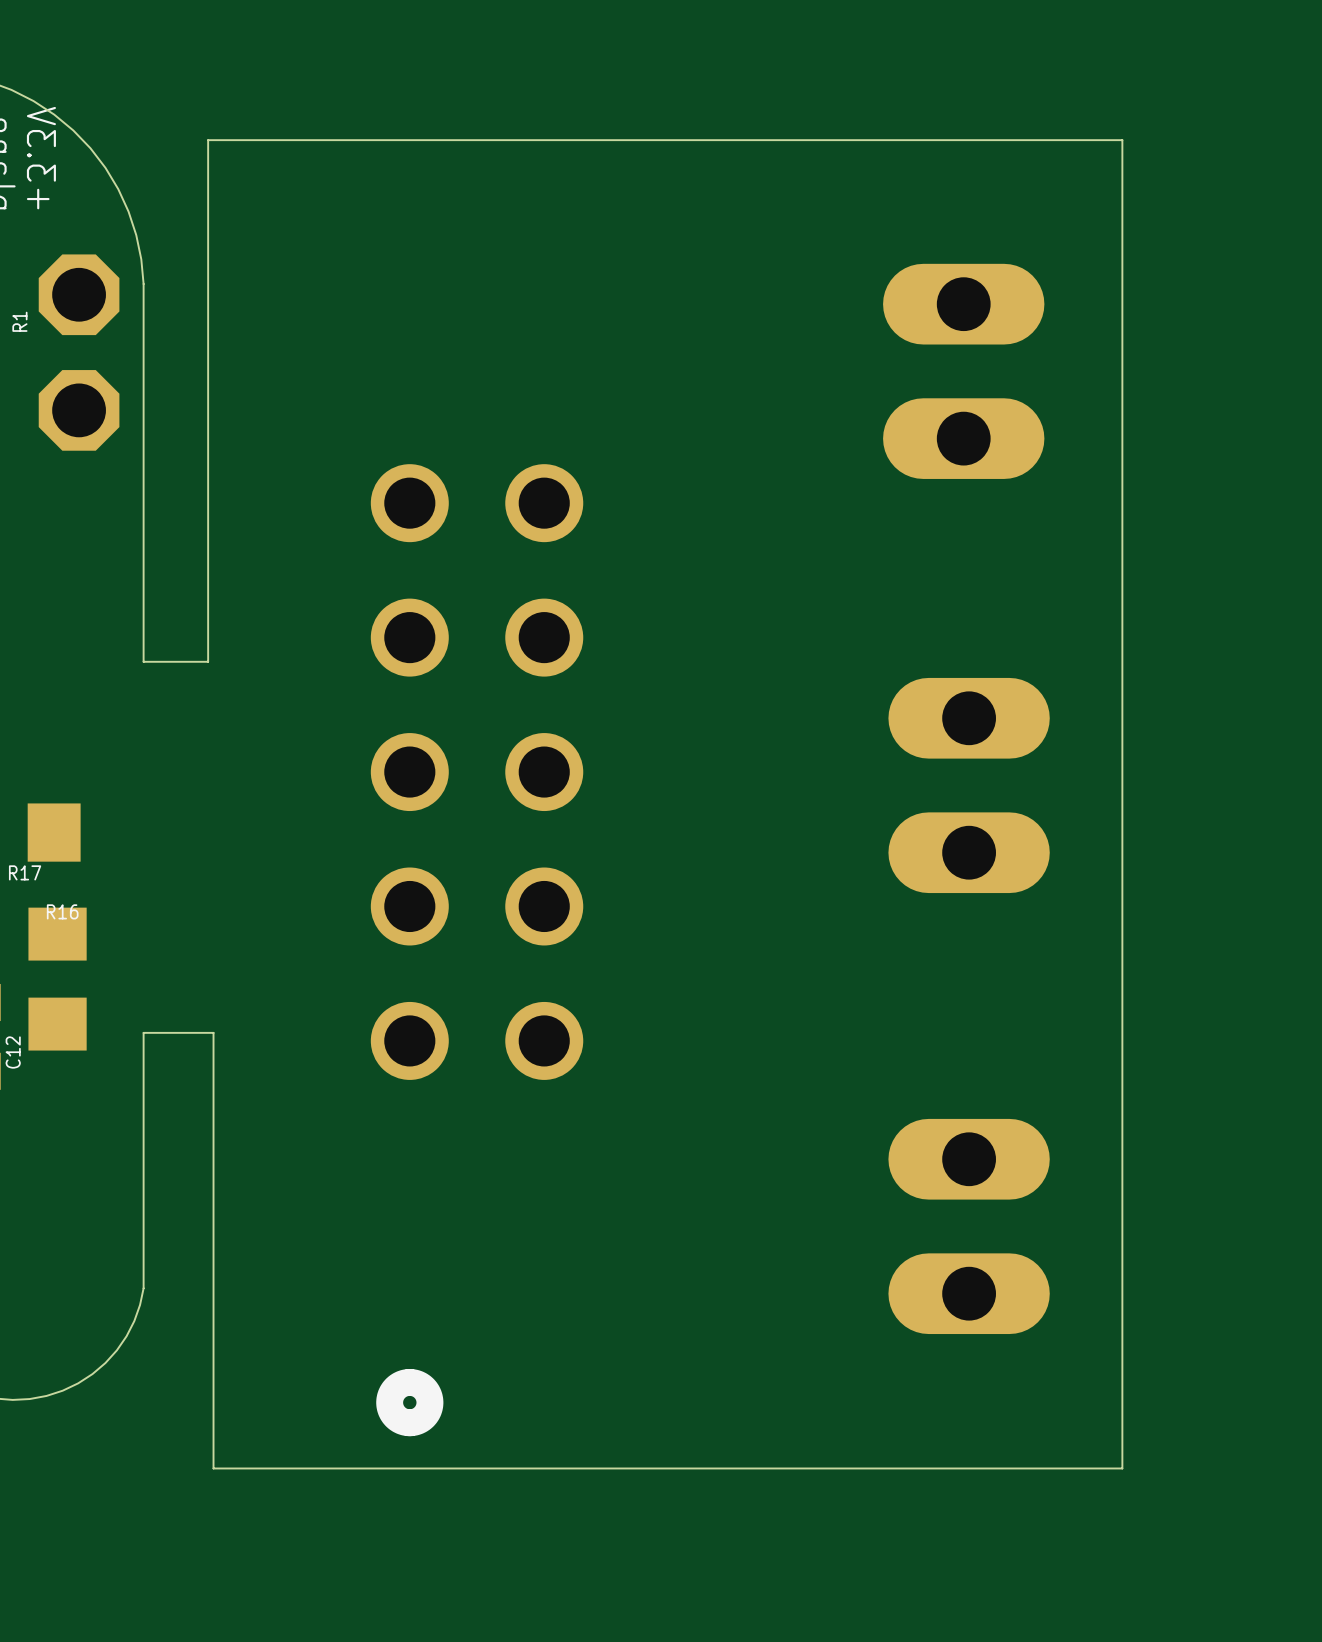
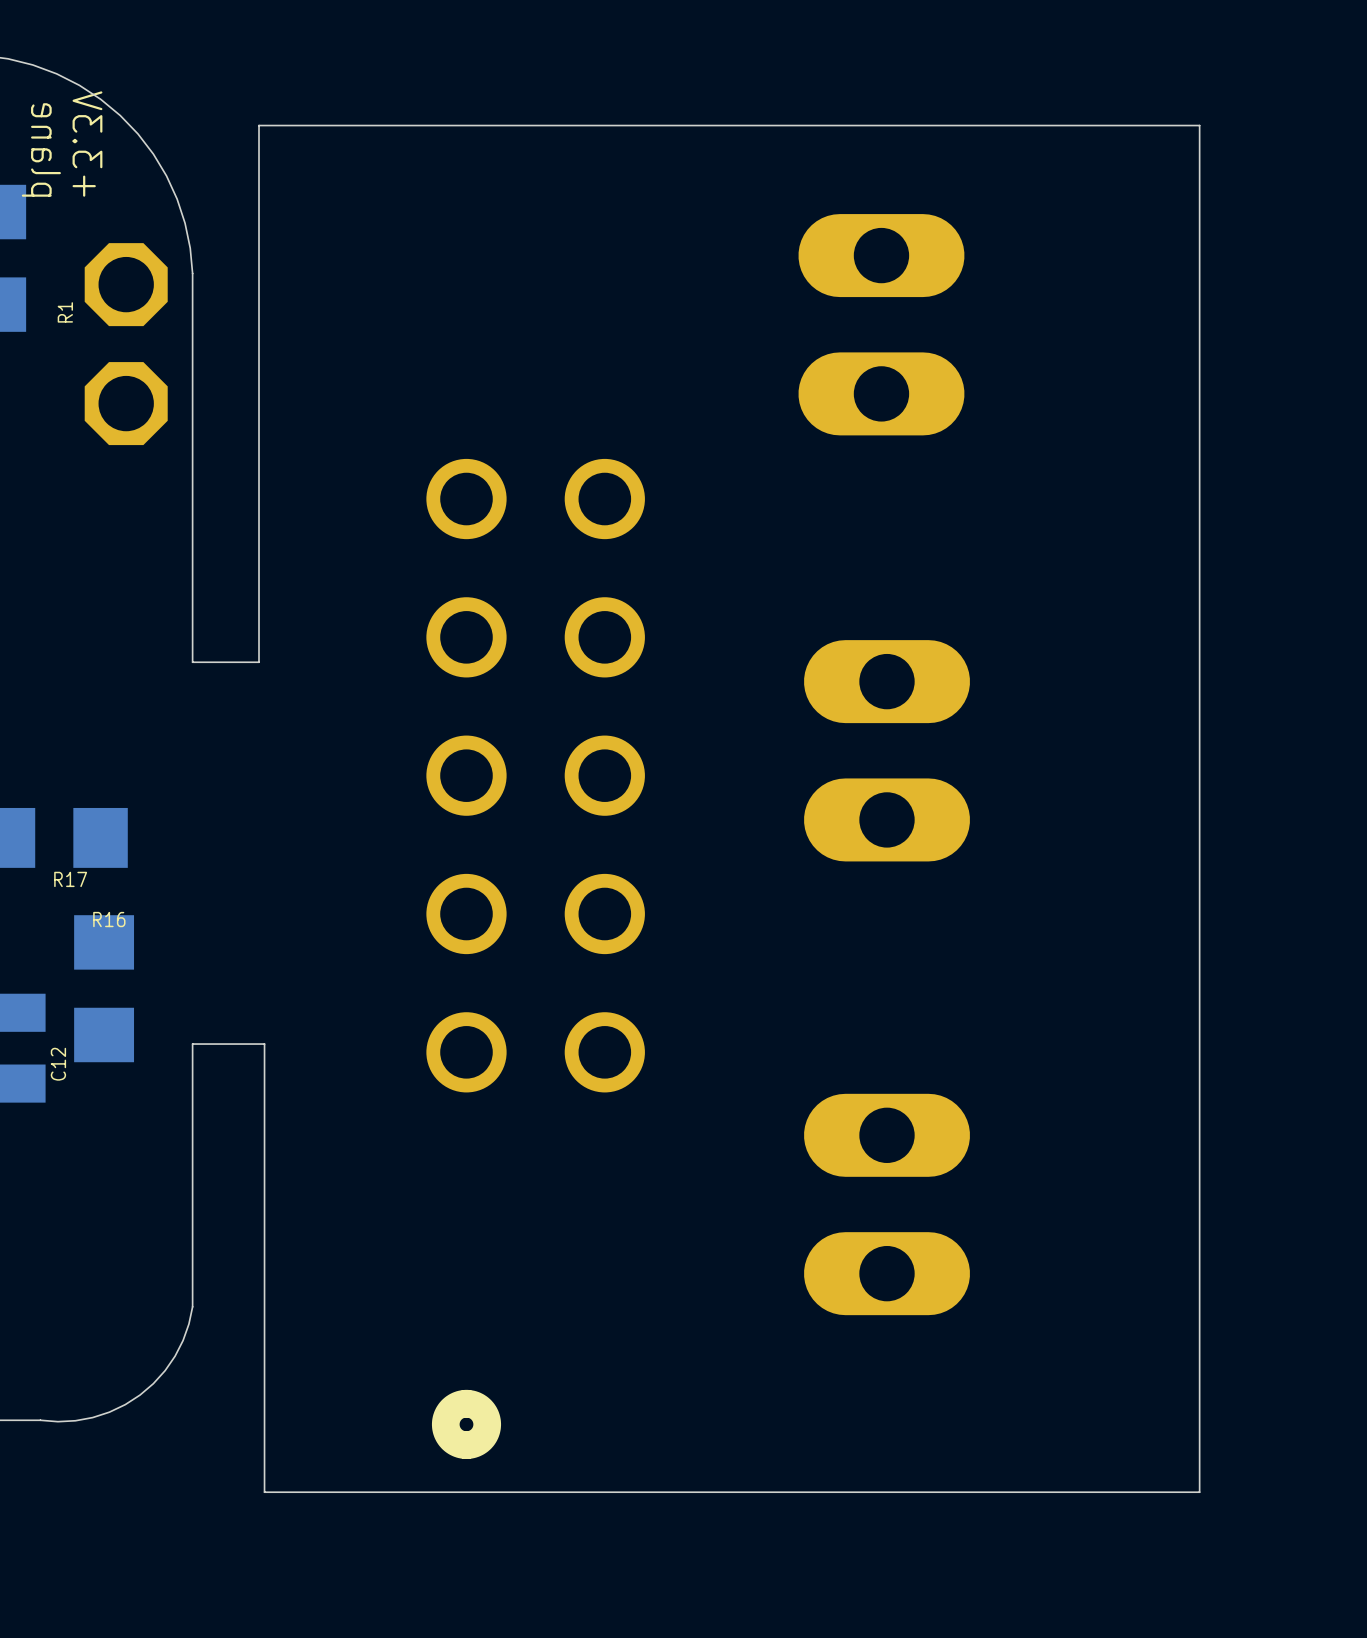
part position: (963, 371) -> (881, 324)
part position: (969, 785) -> (887, 750)
part position: (969, 1226) -> (887, 1204)

